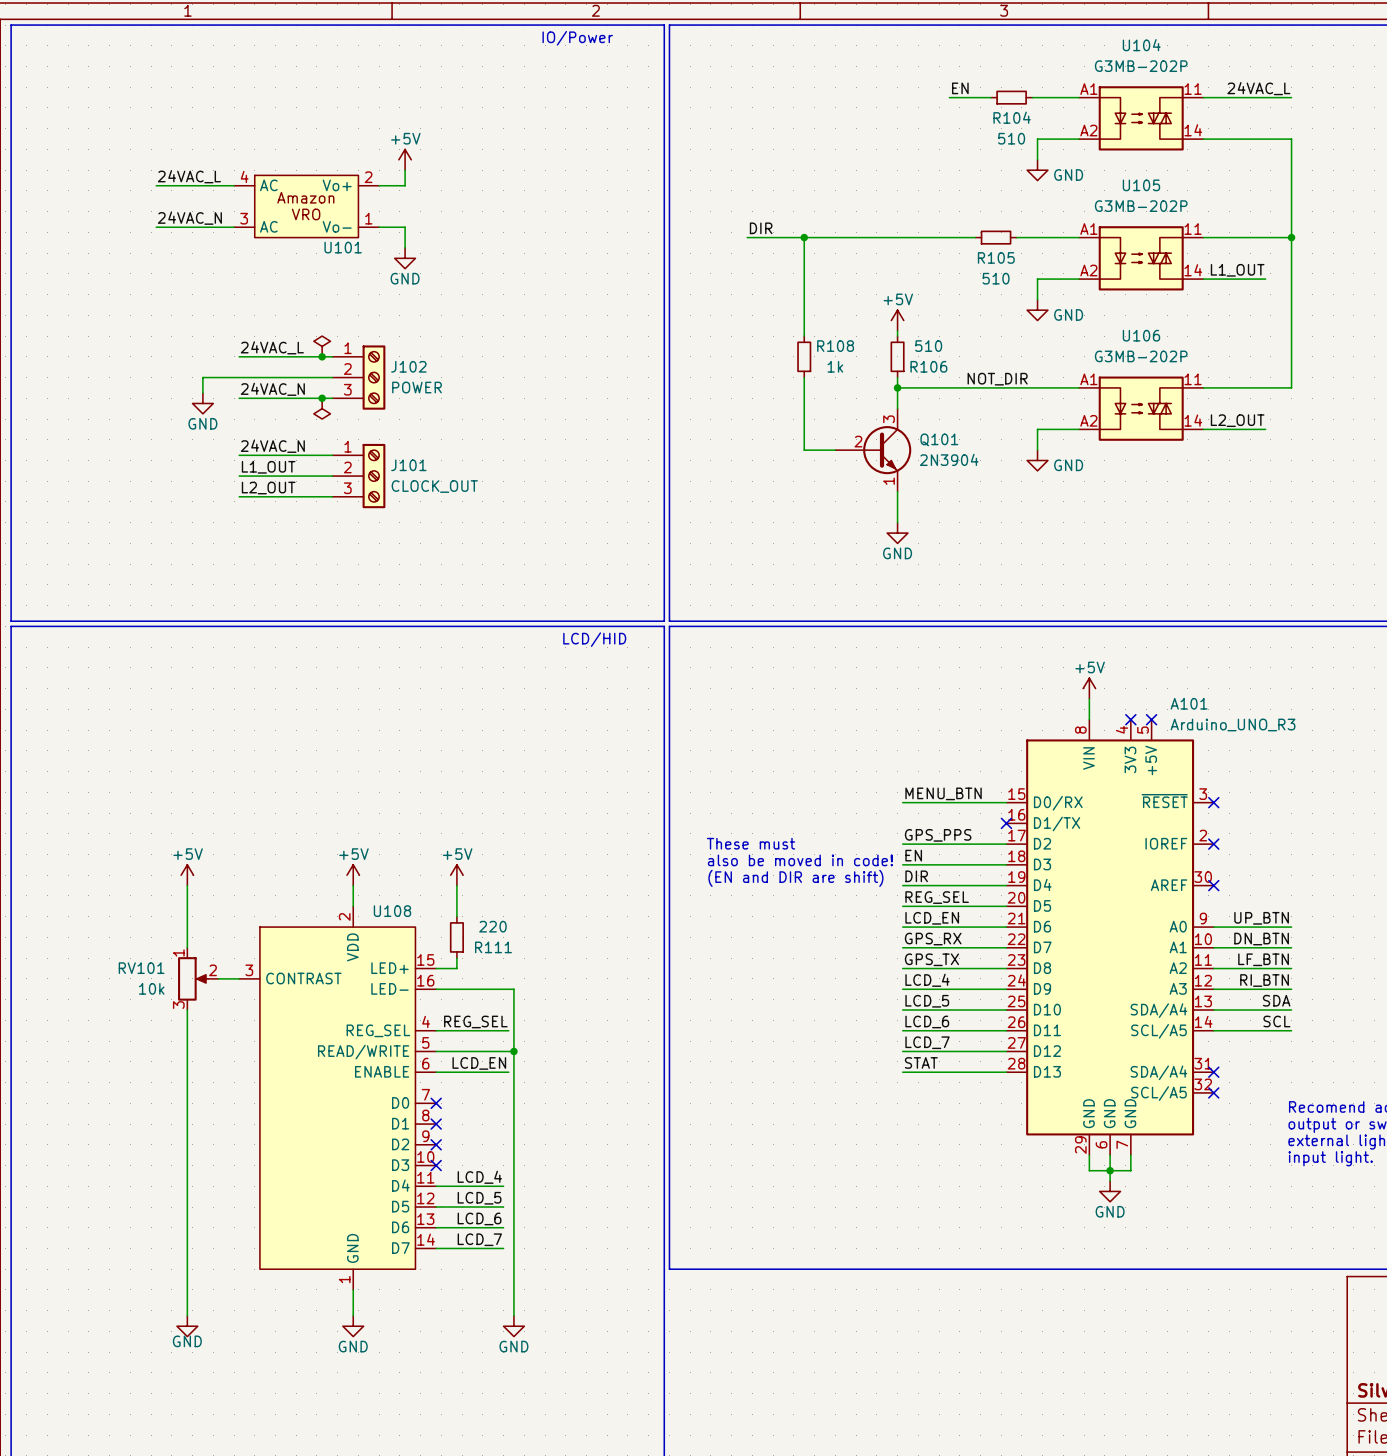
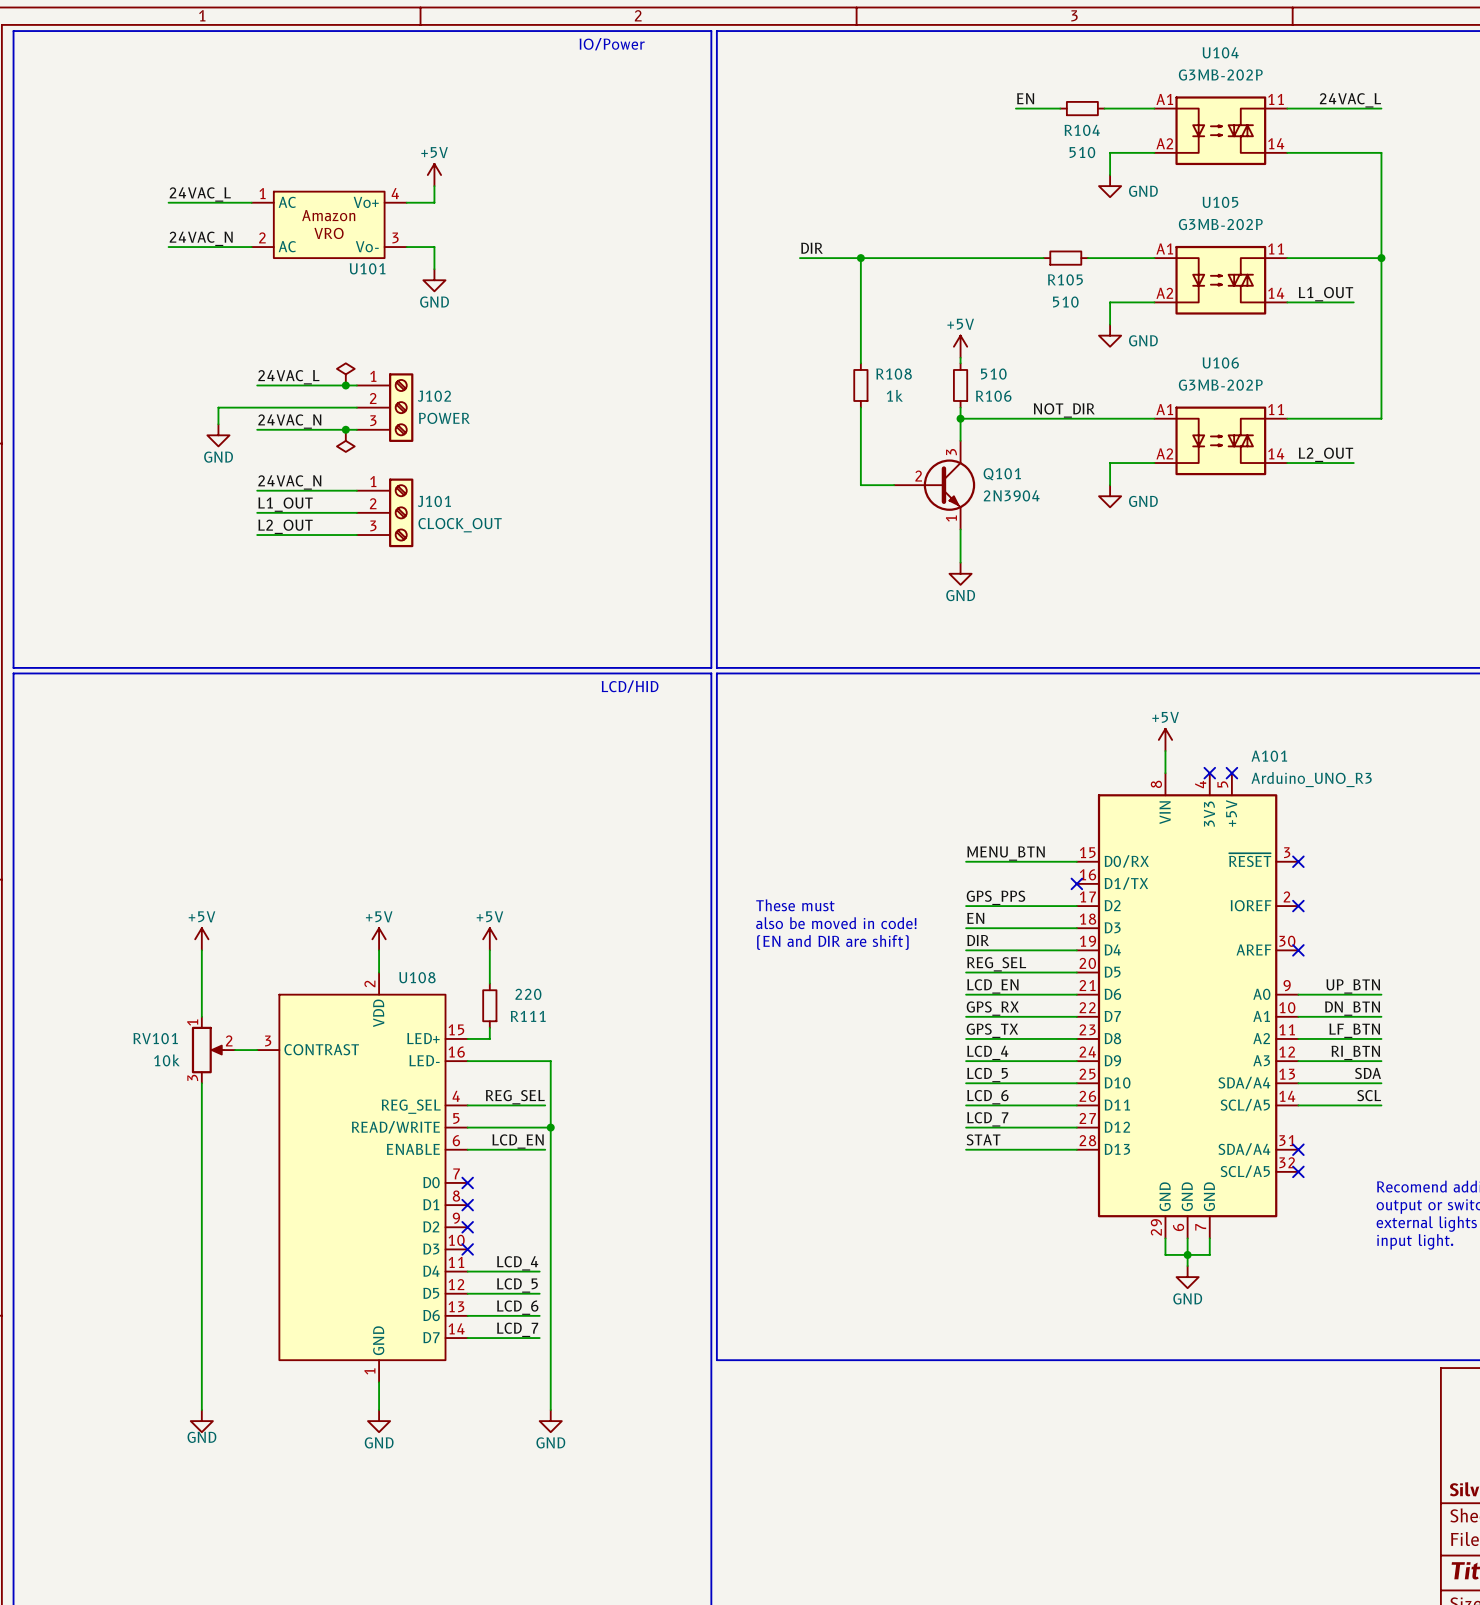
U101 pin number: 4 (244, 176) -> 1 (262, 193)
U101 pin number: 2 (368, 177) -> 4 (395, 193)
U101 pin number: 3 (244, 218) -> 2 (262, 237)
U101 pin number: 1 (368, 218) -> 3 (395, 237)

